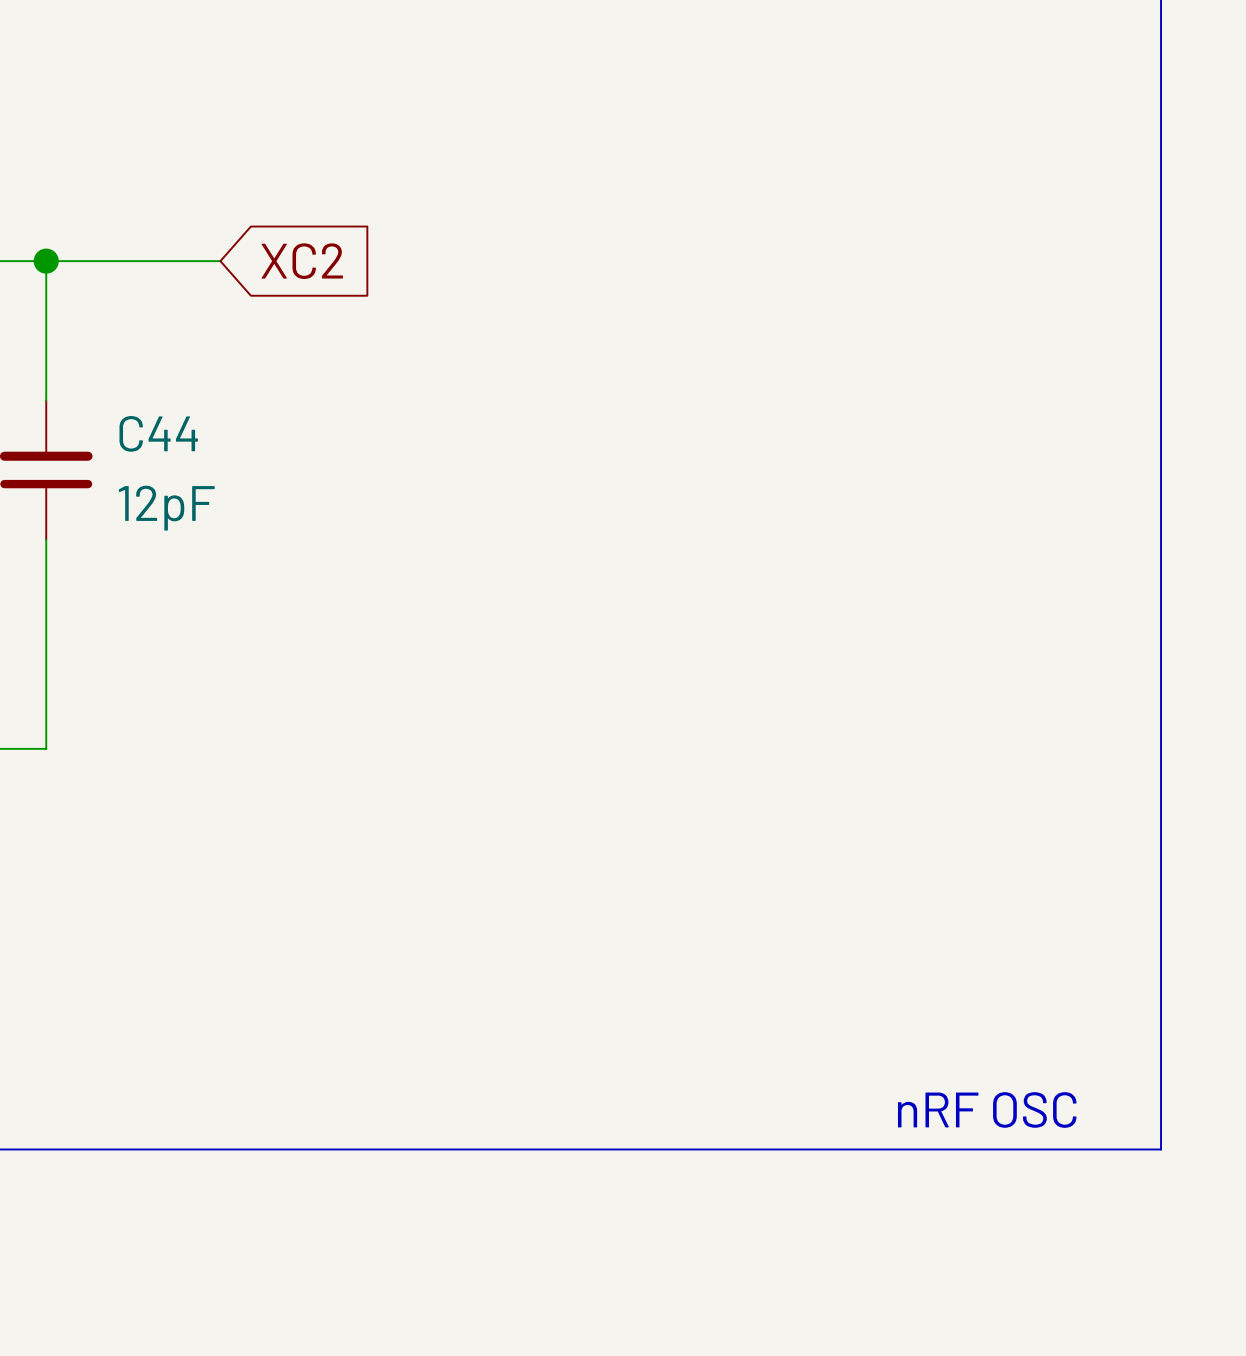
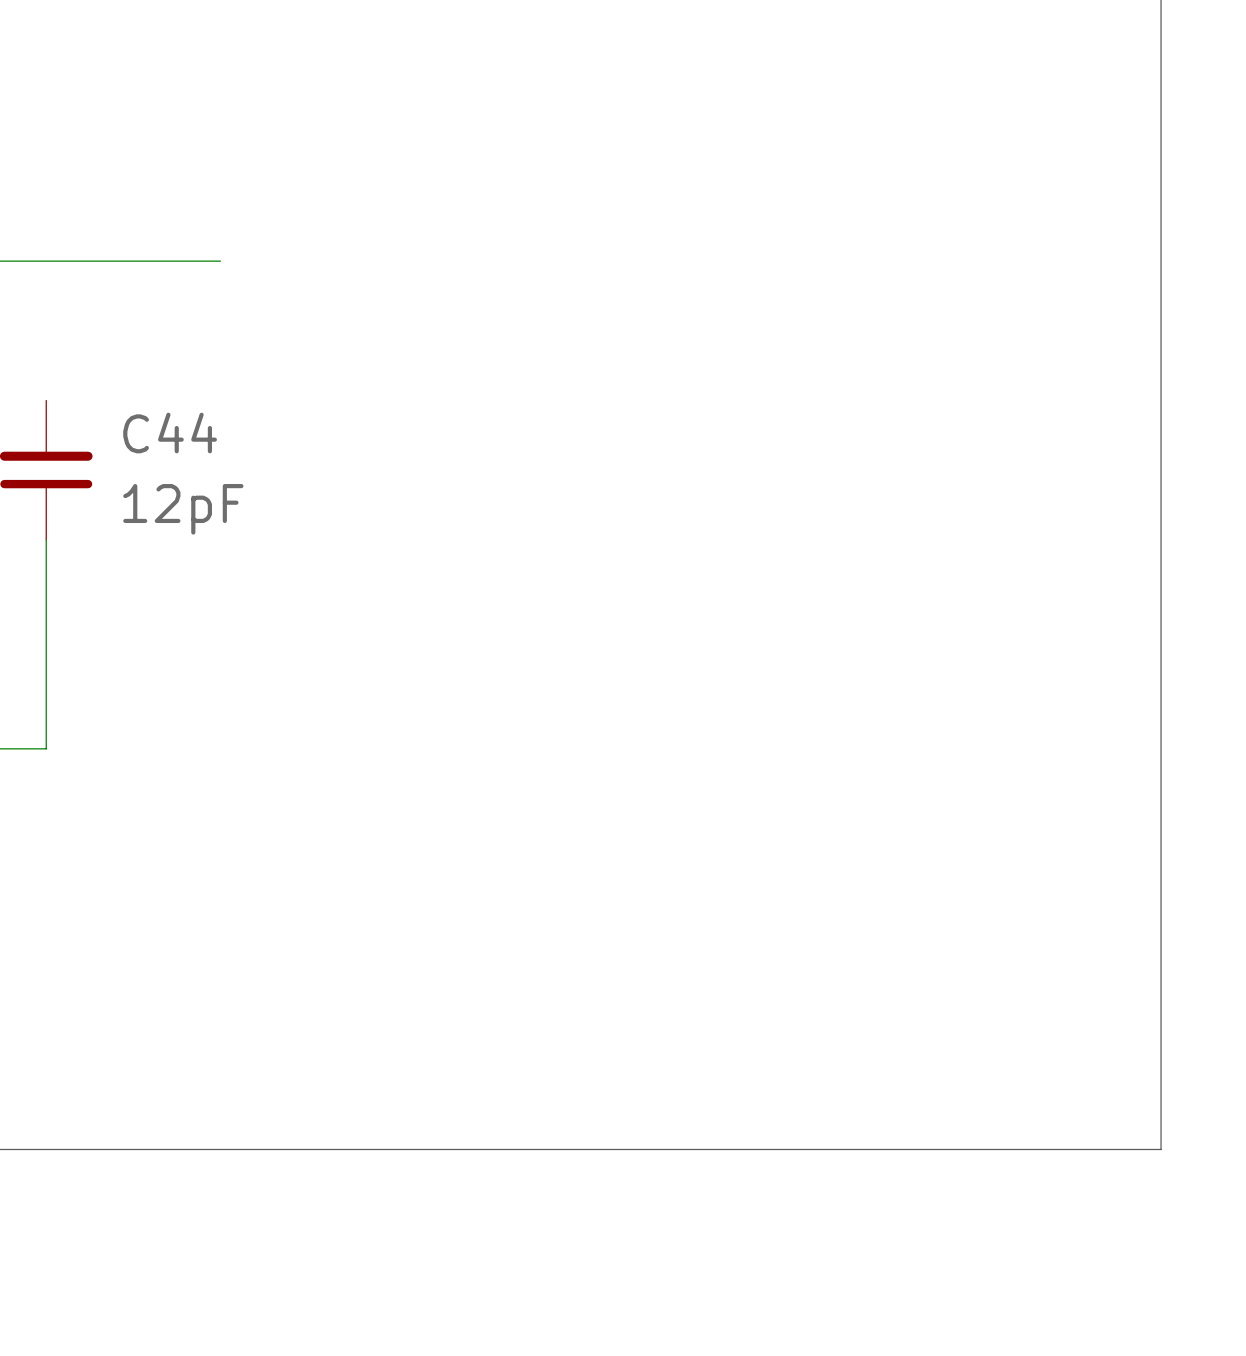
wire: (46, 261) (46, 400) -> none
junction: (46, 261) -> none
global label: XC2 (302, 261) -> none
text: nRF OSC (987, 1109) -> none

